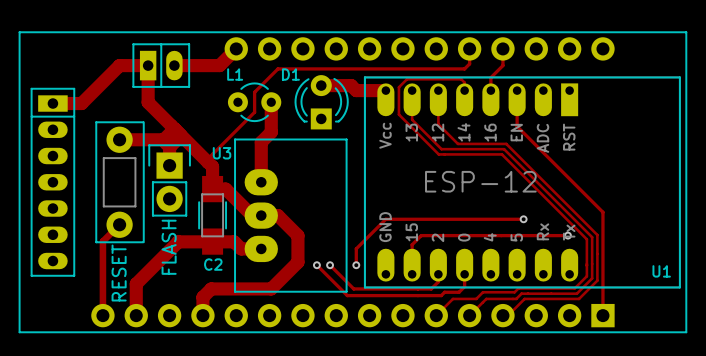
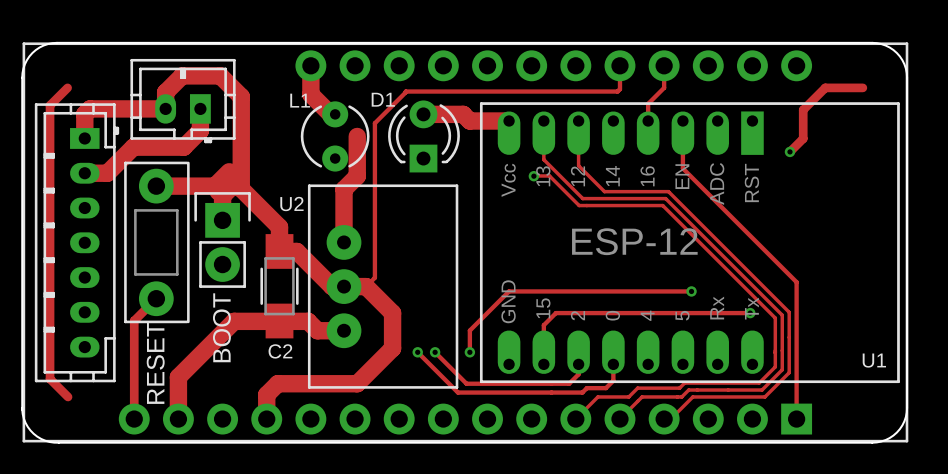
board edge: none -> (56, 42) (872, 42) (885, 45) (899, 56) (904, 64) (907, 77) (907, 407) (904, 421) (896, 432) (889, 438) (872, 442) (58, 442) (41, 438) (27, 426) (22, 409) (22, 77) (24, 64) (32, 53) (43, 45) (56, 42)
track: (236, 48) (219, 65) (174, 65) -> (310, 65) (310, 94) (330, 114) (335, 114)
track: (469, 63) (464, 68) (277, 68) (254, 92) (254, 112) (207, 158) (207, 162) -> (619, 85) (617, 91) (405, 91) (374, 123) (374, 277) (366, 286)
track: none -> (68, 87) (50, 105) (50, 378) (68, 396)
part: (161, 65) -> none
track: none -> (862, 87) (825, 87) (803, 109) (803, 138) (789, 151)
part: none -> (183, 101)
track: none -> (200, 108) (200, 130) (183, 147) (133, 147) (107, 173) (84, 173)
L1 footprint: [227, 82, 282, 123] -> [300, 101, 370, 172]
part footprint: [30, 87, 76, 277] -> [34, 103, 120, 383]
track: (464, 90) (464, 82) (461, 79) (406, 79) (398, 87) (398, 114) (416, 132) -> (534, 175) (549, 175)
track: (52, 103) (81, 103) (119, 65) (148, 65) (148, 102) (212, 166) (212, 170) -> (84, 138) (84, 114) (90, 108) (165, 108) (165, 92) (182, 75) (220, 75) (241, 96) (241, 188) (279, 227)
via: none -> (789, 151)
via: none -> (533, 176)
U3: (290, 215) -> none
U2: none -> (383, 286)
part value: FLASH (169, 247) -> BOOT (221, 327)

